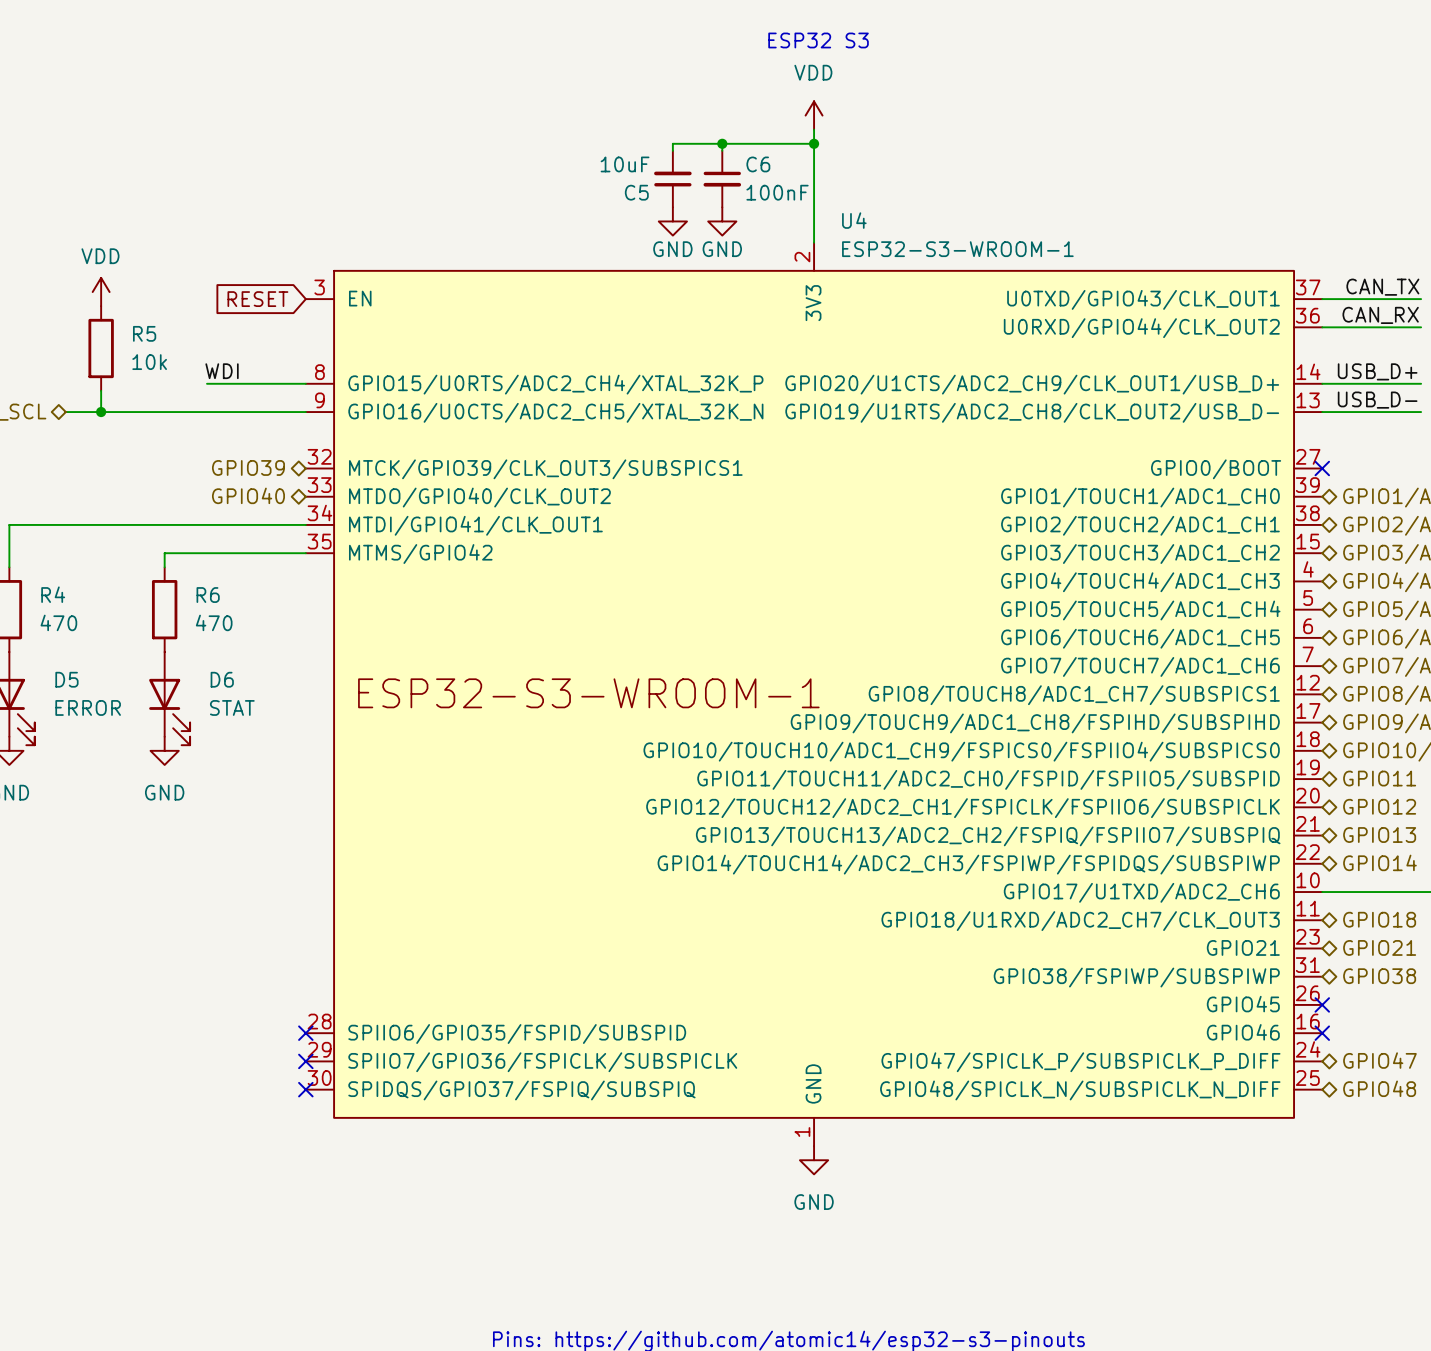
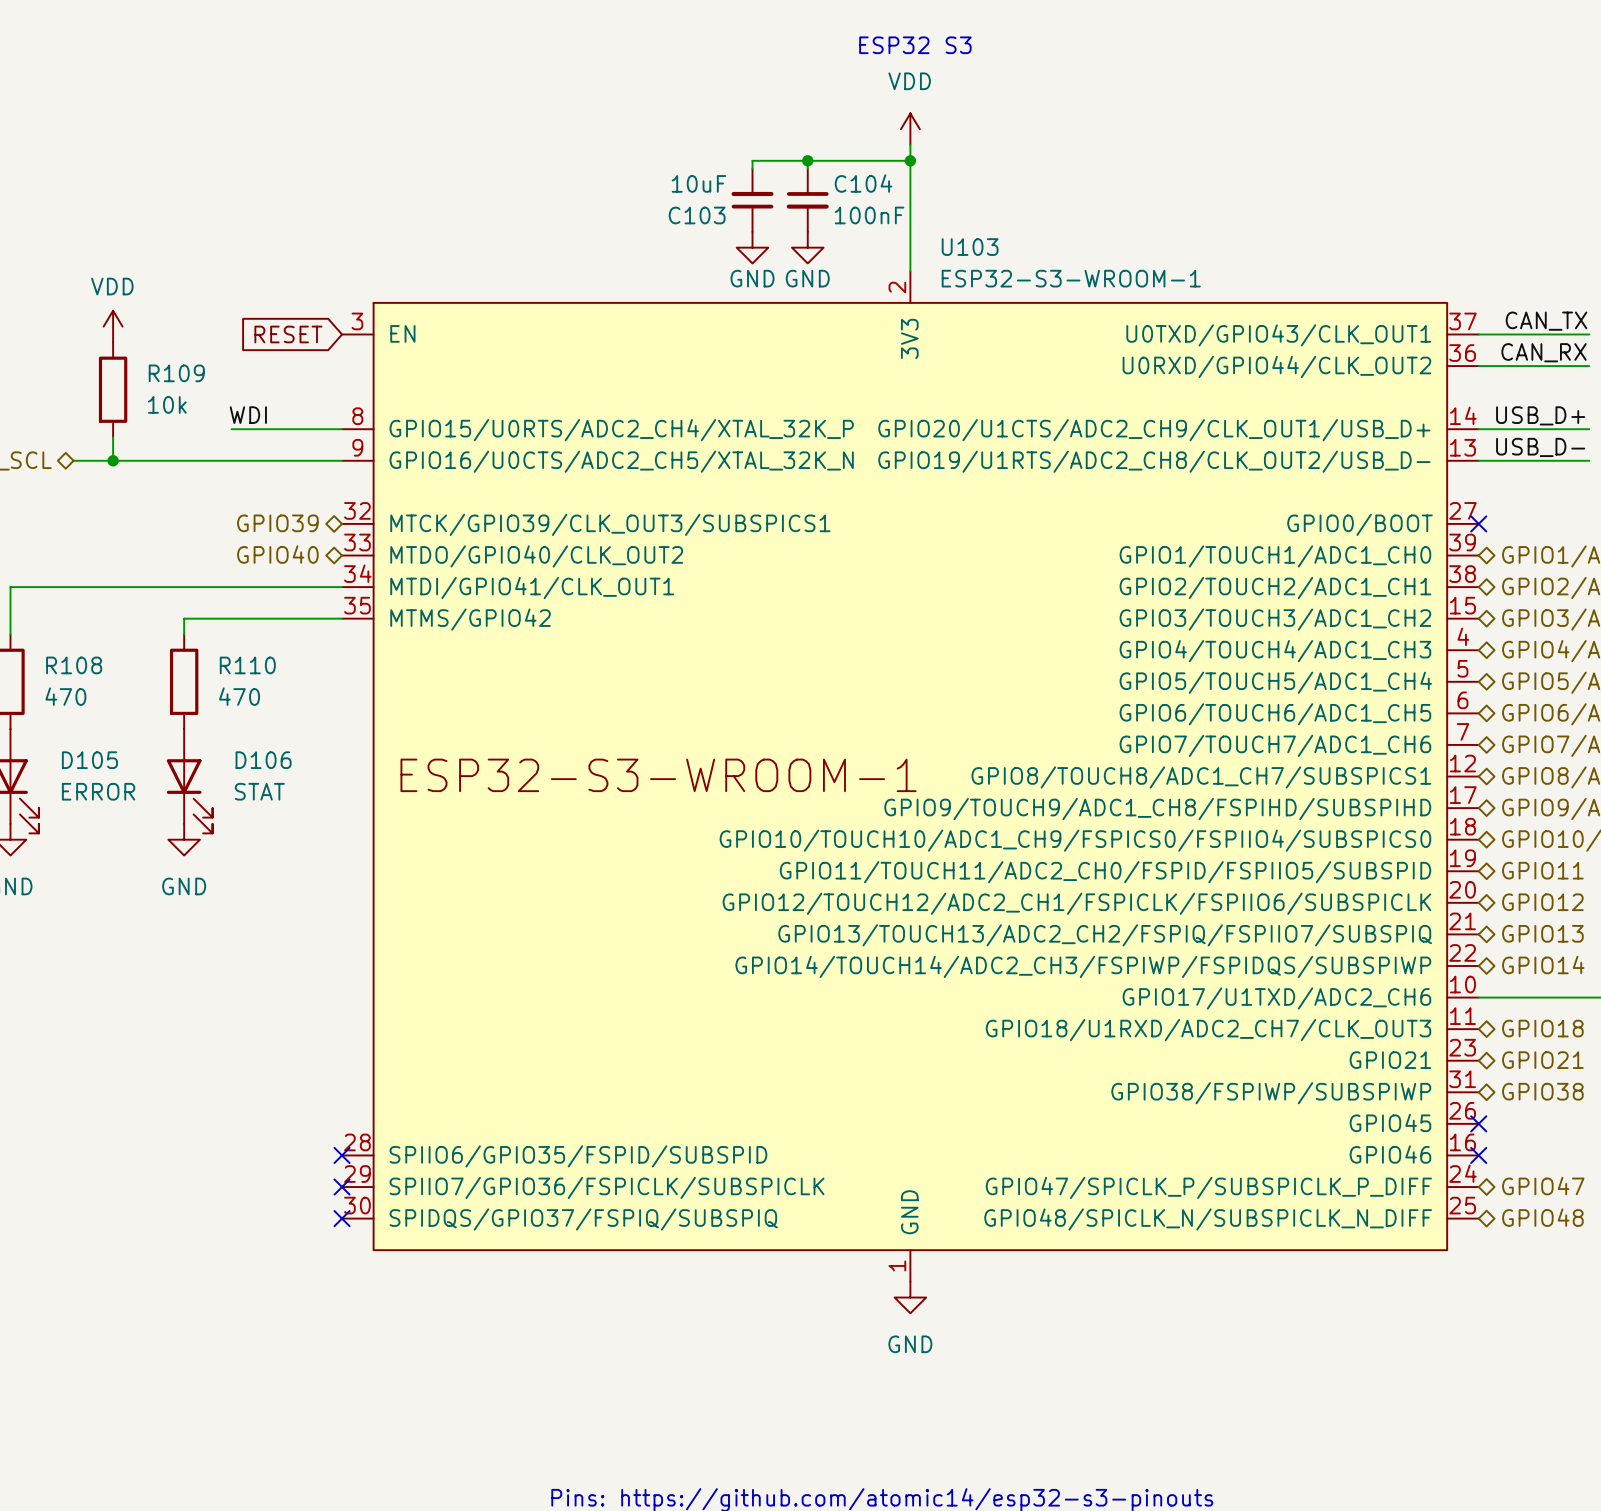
C6 name: C6 (758, 164) -> C104 (863, 183)
C5 name: C5 (636, 192) -> C103 (697, 215)
U4 name: U4 (854, 220) -> U103 (970, 247)
R5 name: R5 (144, 333) -> R109 (176, 373)
R4 name: R4 (53, 594) -> R108 (74, 665)
R6 name: R6 (208, 595) -> R110 (247, 665)
D5 name: D5 (66, 679) -> D105 (89, 760)
D6 name: D6 (222, 679) -> D106 (263, 760)

